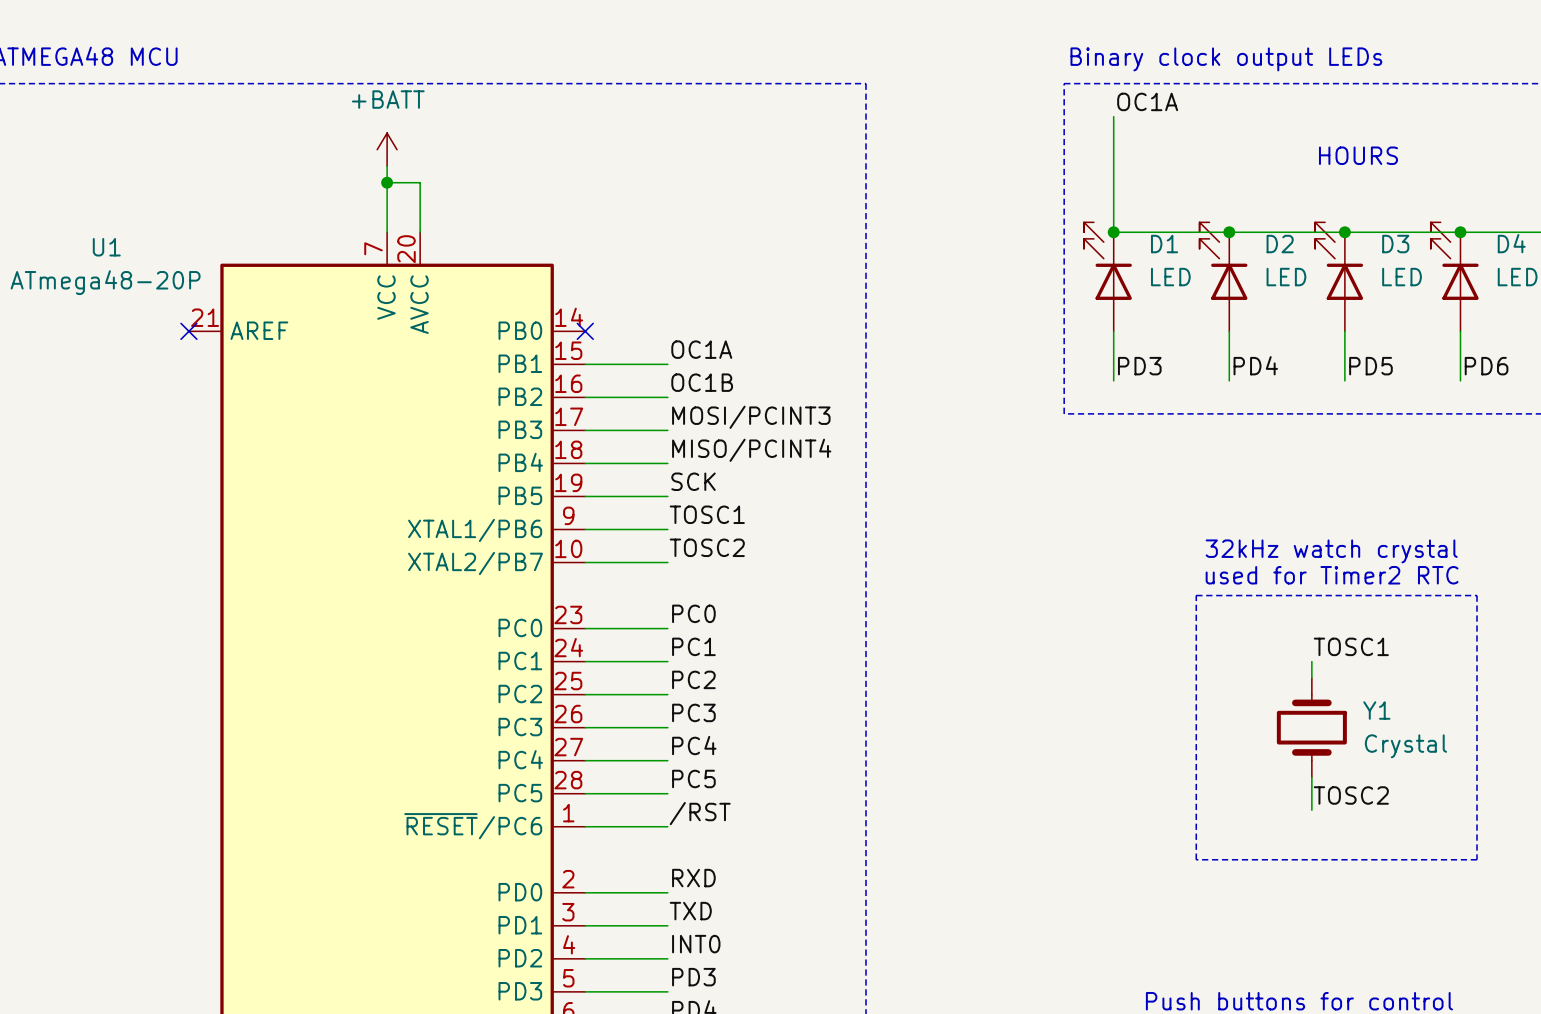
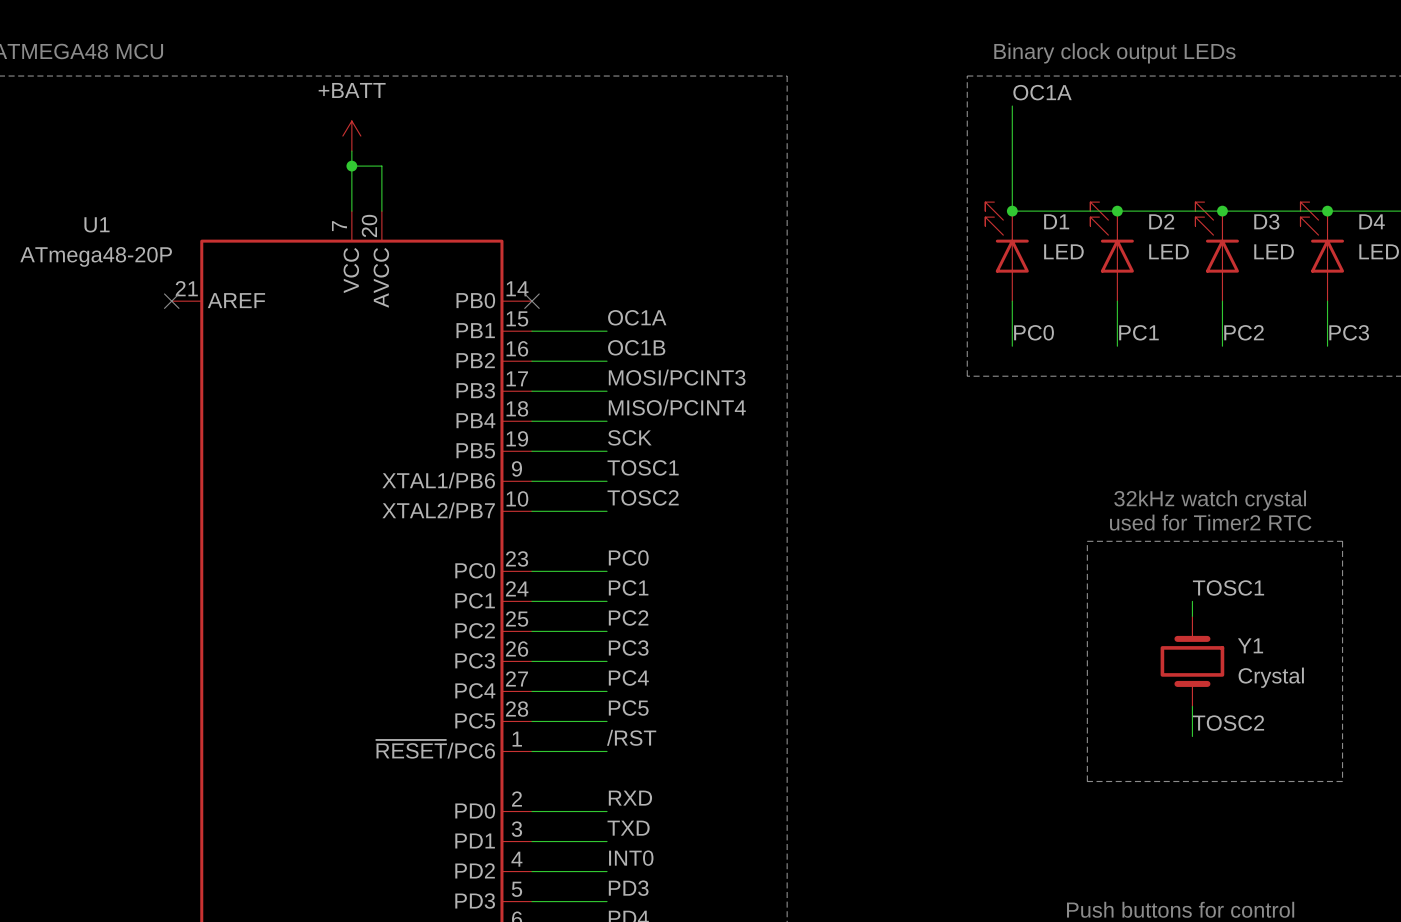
text: HOURS (1358, 155) -> none
label: PD4 (1255, 365) -> PC1 (1138, 332)
label: PD3 (1139, 366) -> PC0 (1034, 332)
label: PD5 (1370, 366) -> PC2 (1244, 332)
label: PD6 (1486, 366) -> PC3 (1349, 332)

